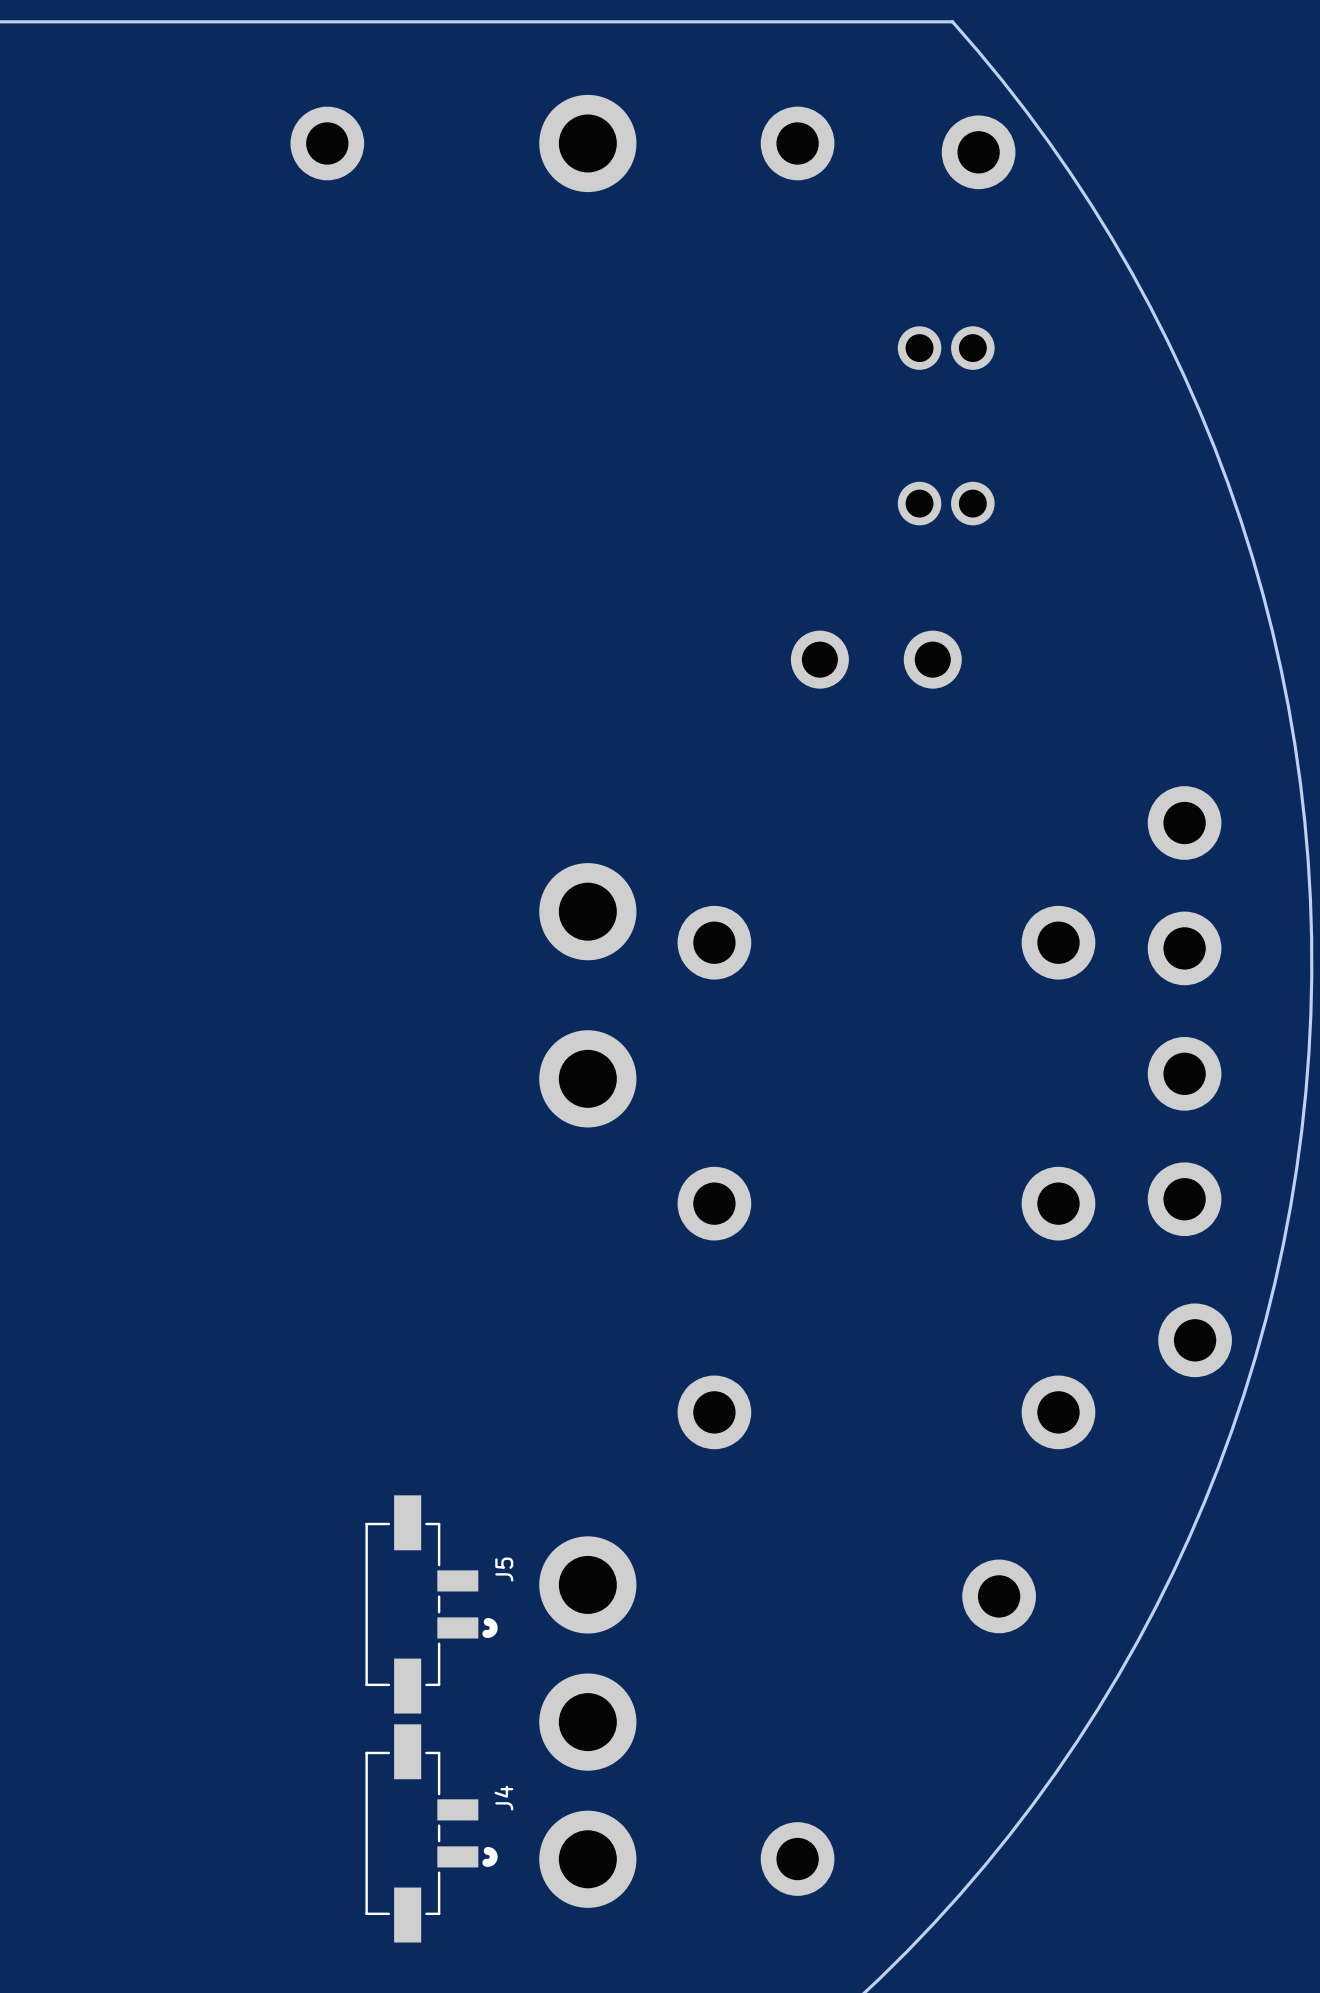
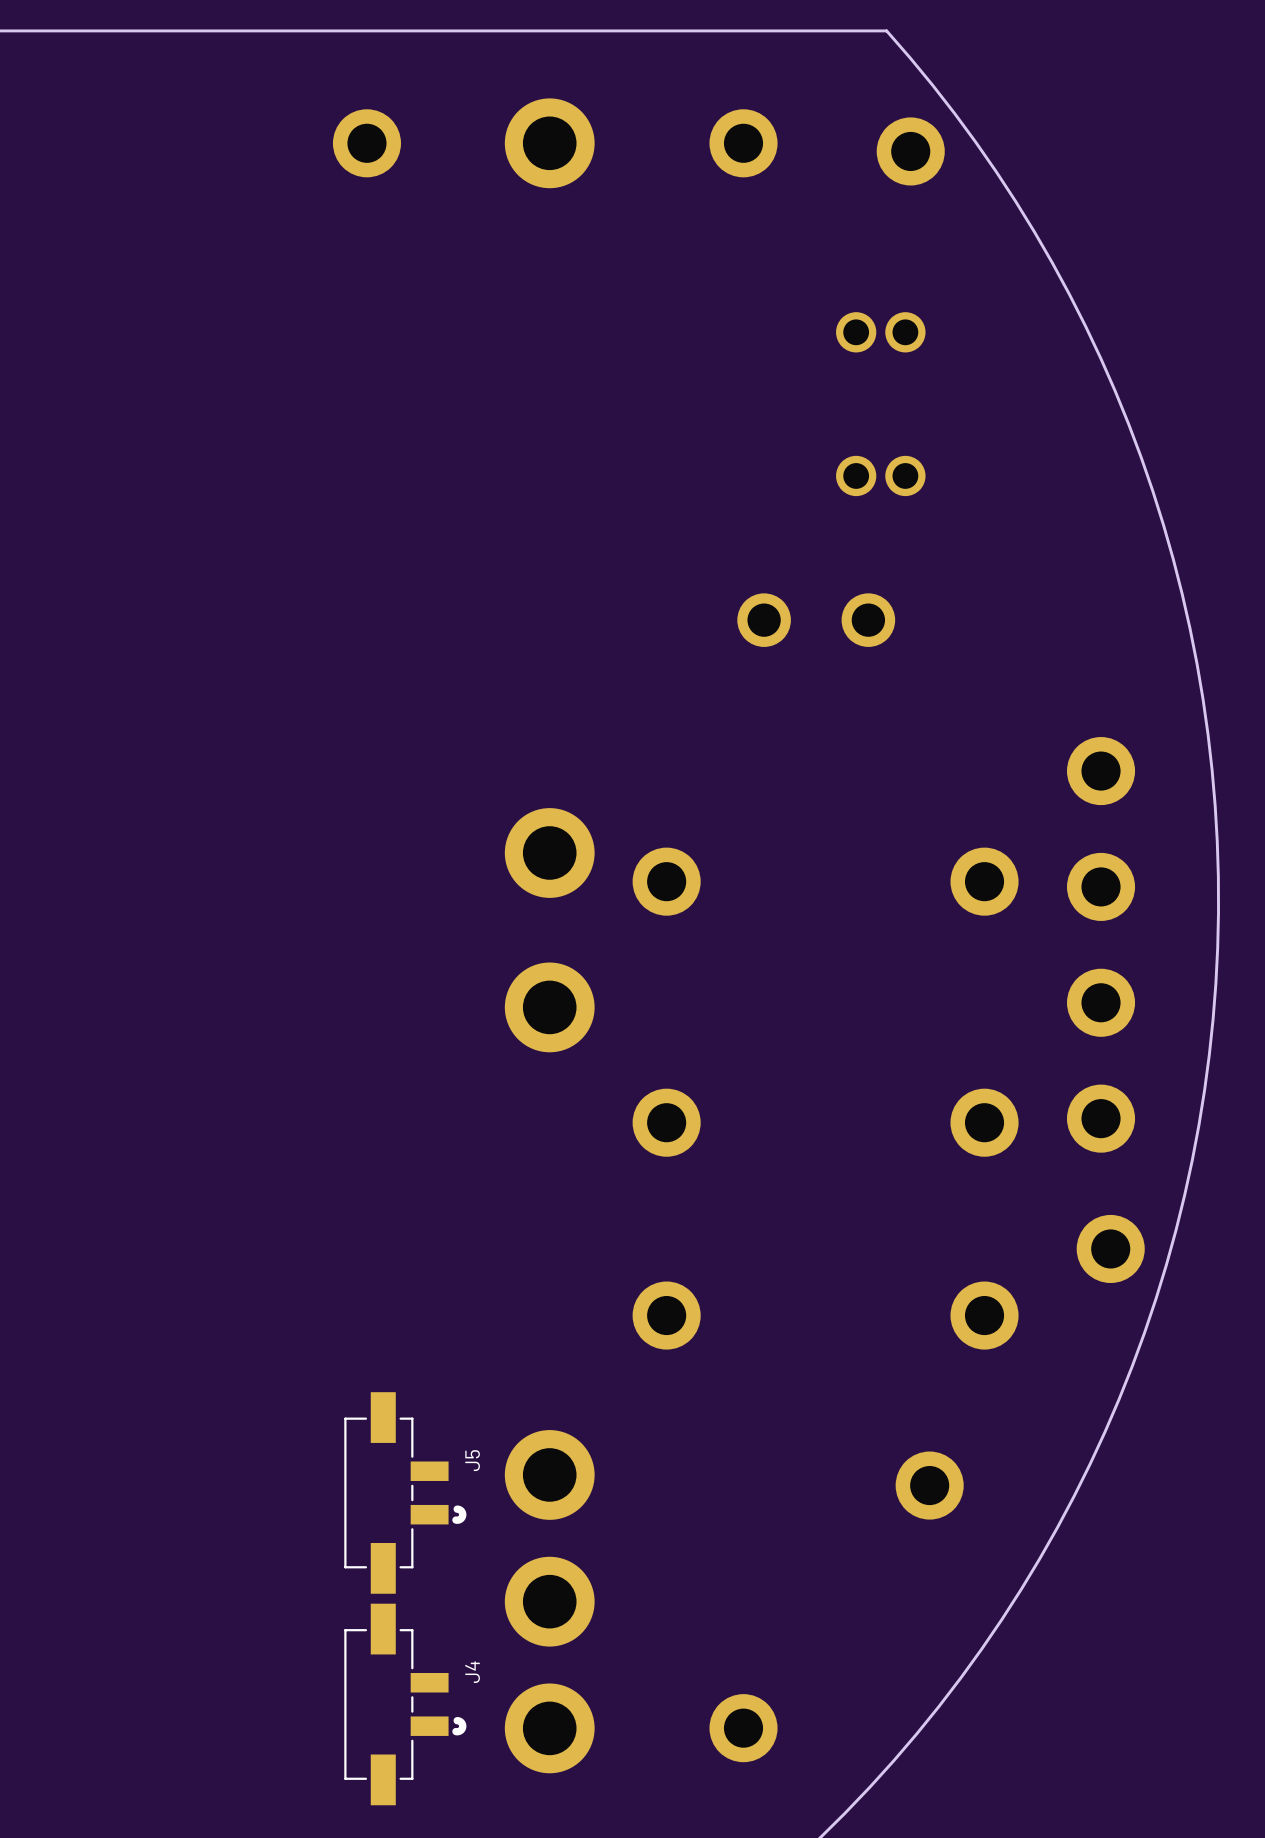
part position: (327, 143) -> (366, 143)

